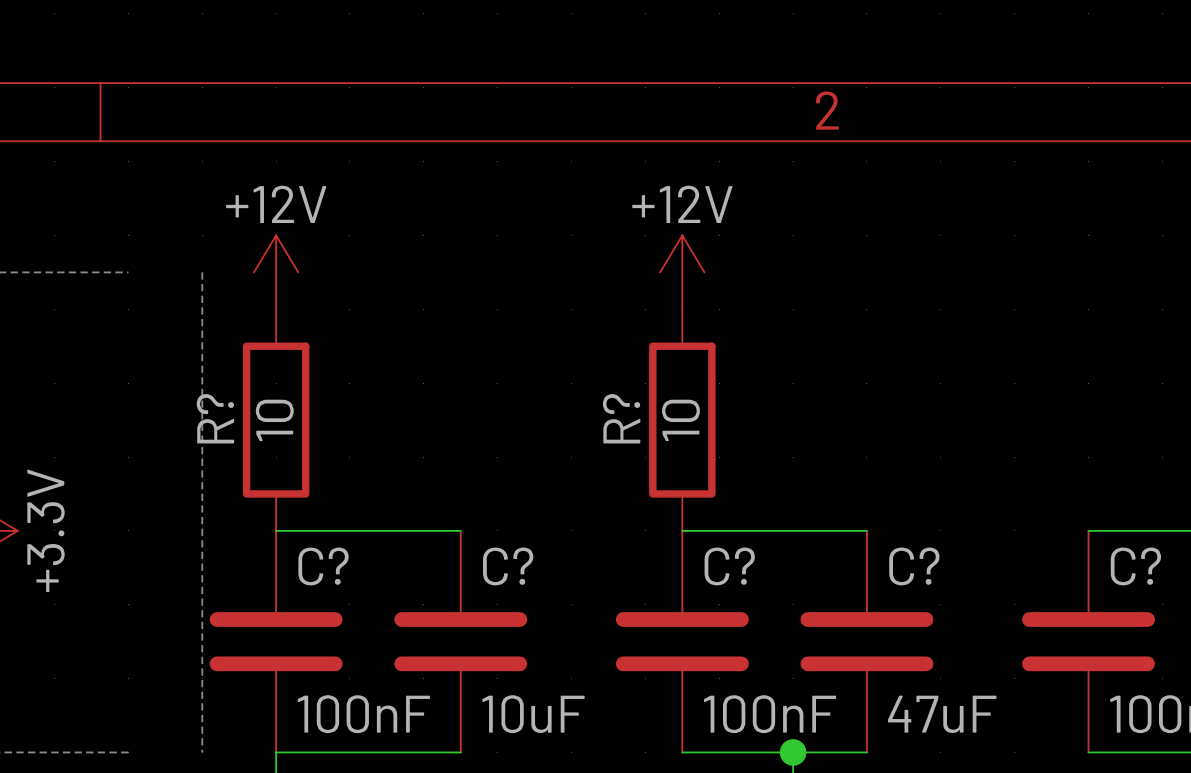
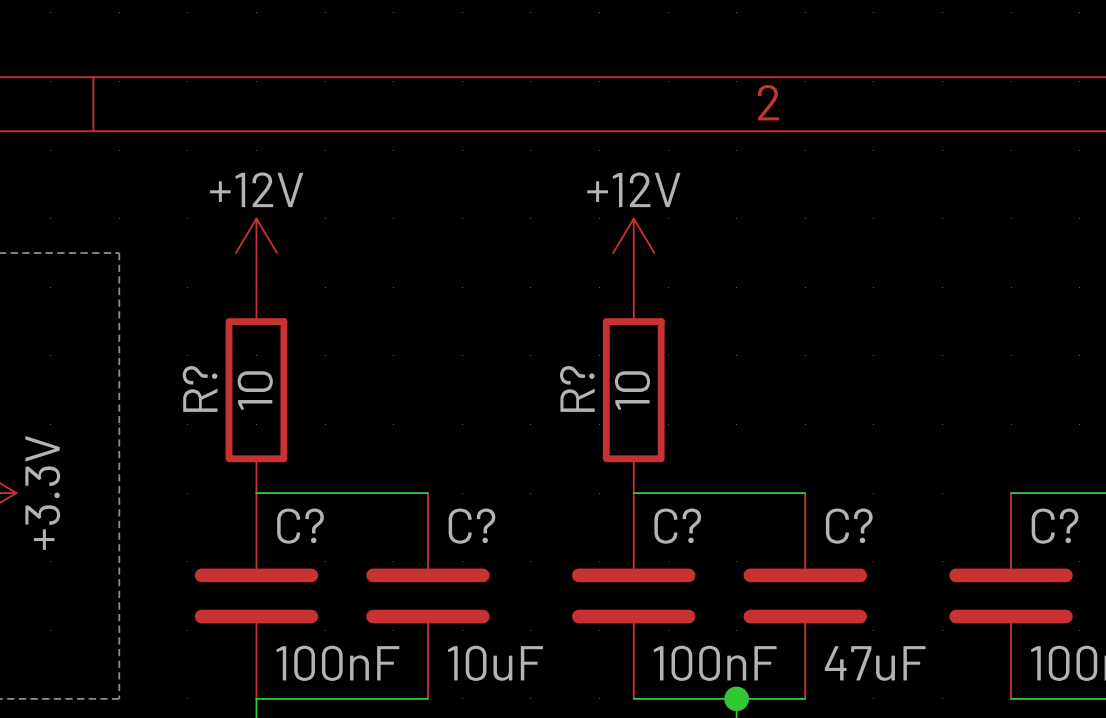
line: (202, 272) (202, 752) -> (119, 253) (119, 698)

